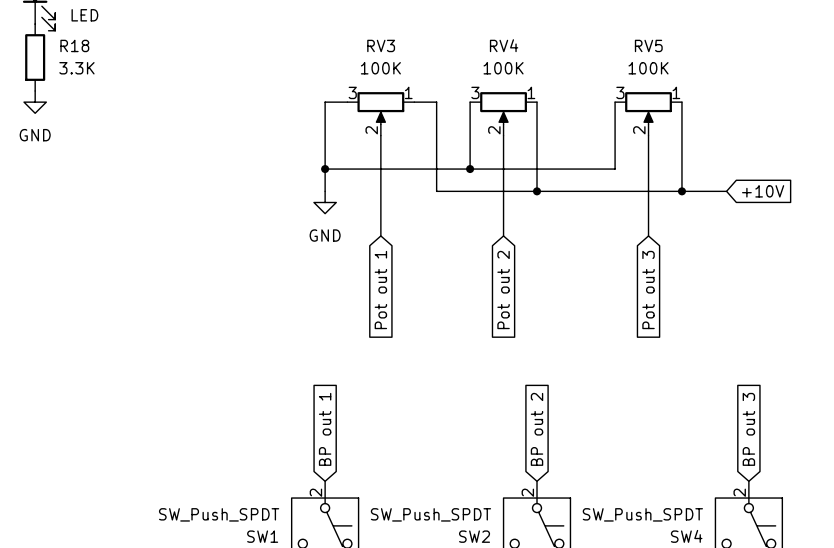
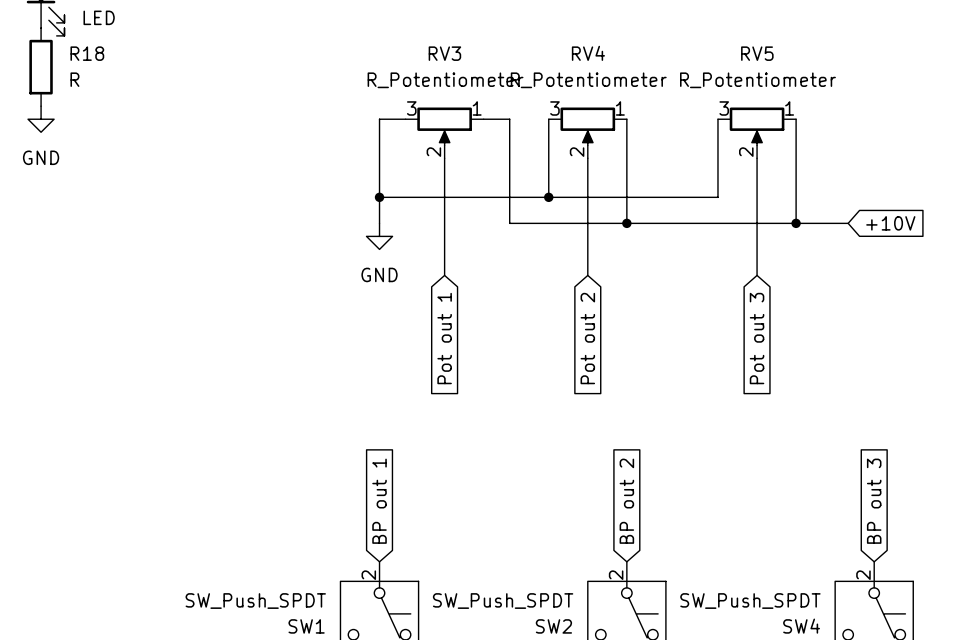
R18 value: 3.3K (76, 68) -> R (74, 79)
RV3 value: 100K (380, 68) -> R_Potentiometer (445, 80)
RV4 value: 100K (503, 68) -> R_Potentiometer (588, 80)
RV5 value: 100K (648, 68) -> R_Potentiometer (757, 80)

